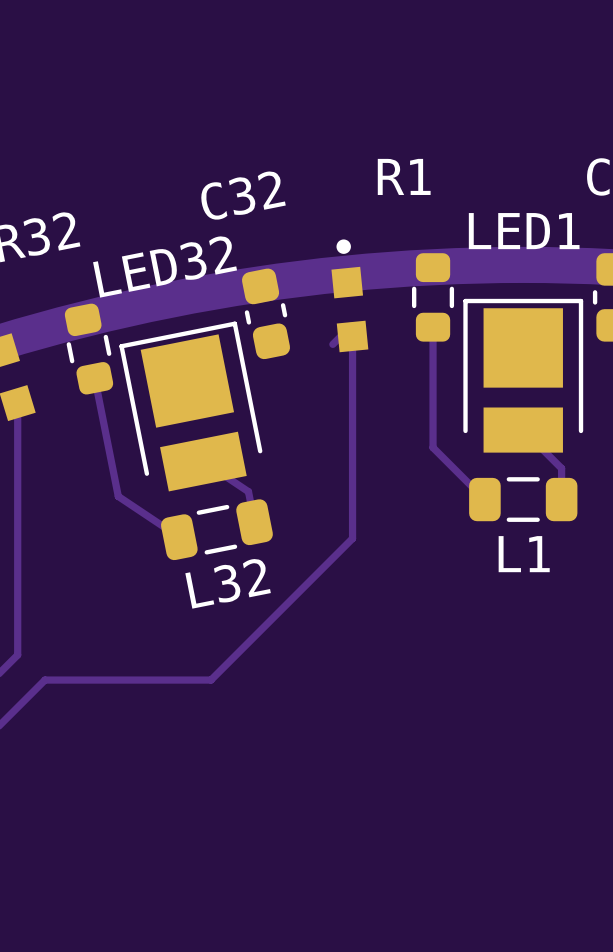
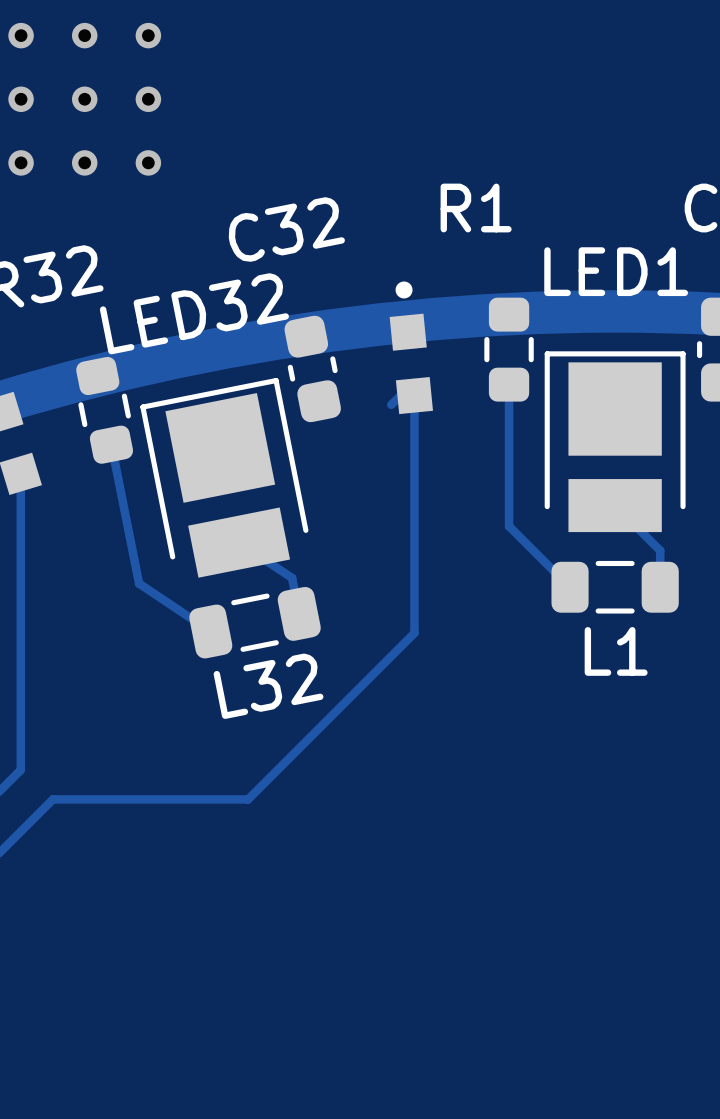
via: none -> (21, 35)
via: none -> (84, 35)
via: none -> (148, 35)
via: none -> (21, 99)
via: none -> (84, 99)
via: none -> (148, 99)
via: none -> (21, 162)
via: none -> (84, 162)
via: none -> (148, 162)

